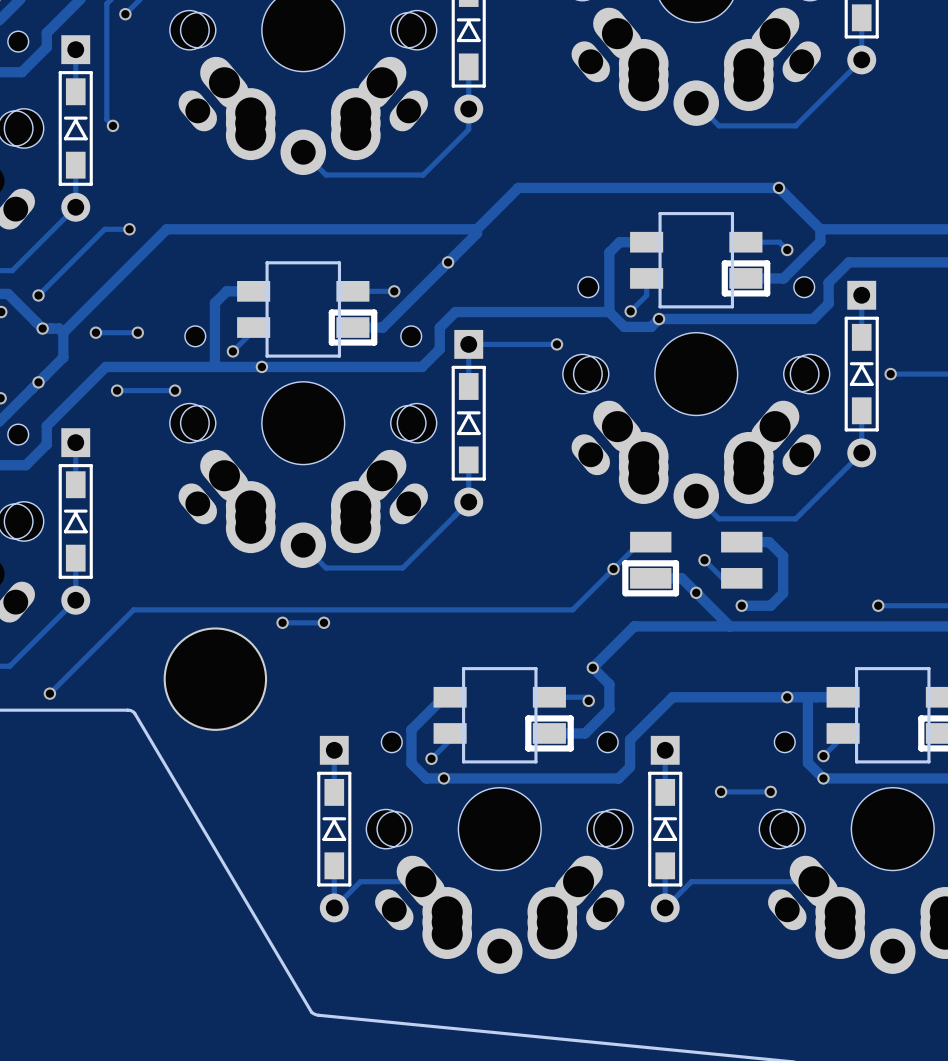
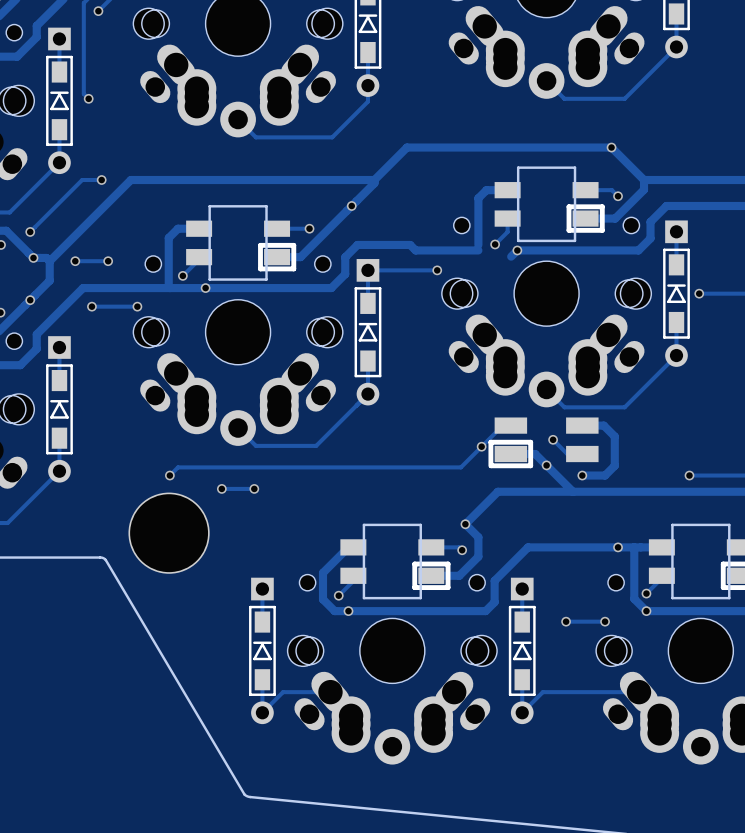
track: (522, 312) (609, 312) (624, 326) (651, 326) -> (410, 244) (415, 250) (478, 250)
track: (587, 595) (572, 609) (133, 609) (49, 693) -> (460, 467) (178, 467) (169, 475)
via: none -> (169, 475)
via: (49, 693) -> none

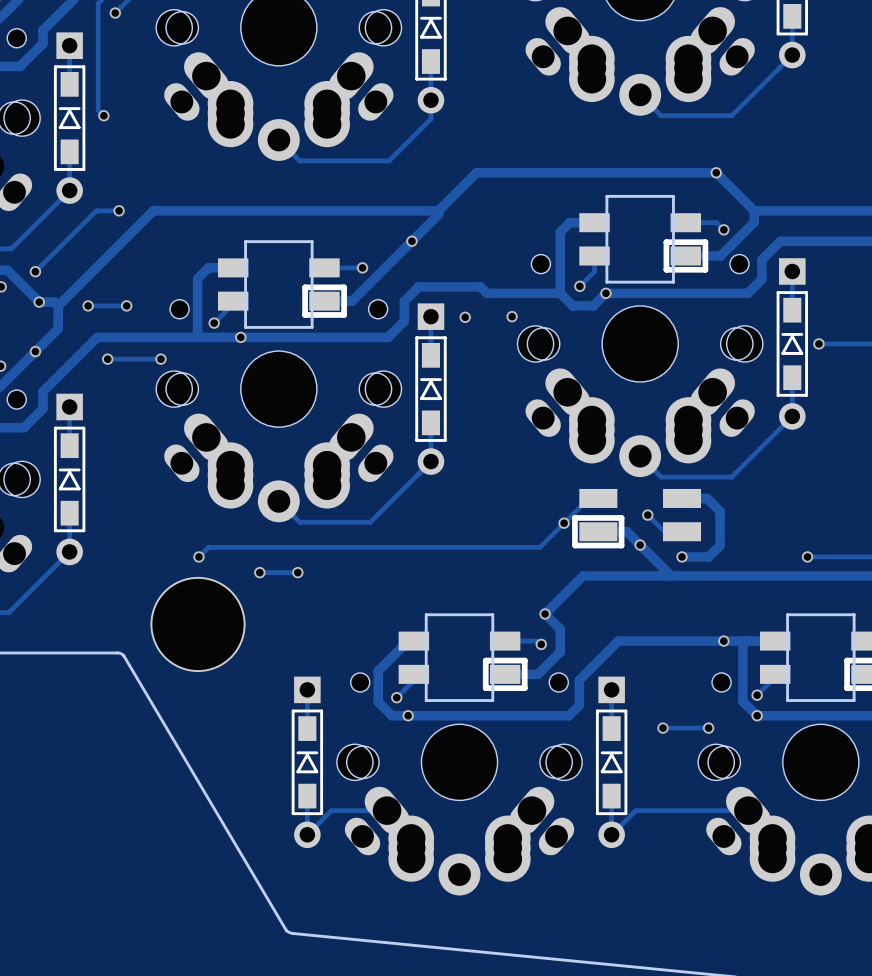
track: none -> (560, 286) (560, 293) (572, 305) (593, 305) (598, 300)
track: (367, 270) (437, 270) -> none
via: none -> (465, 317)

